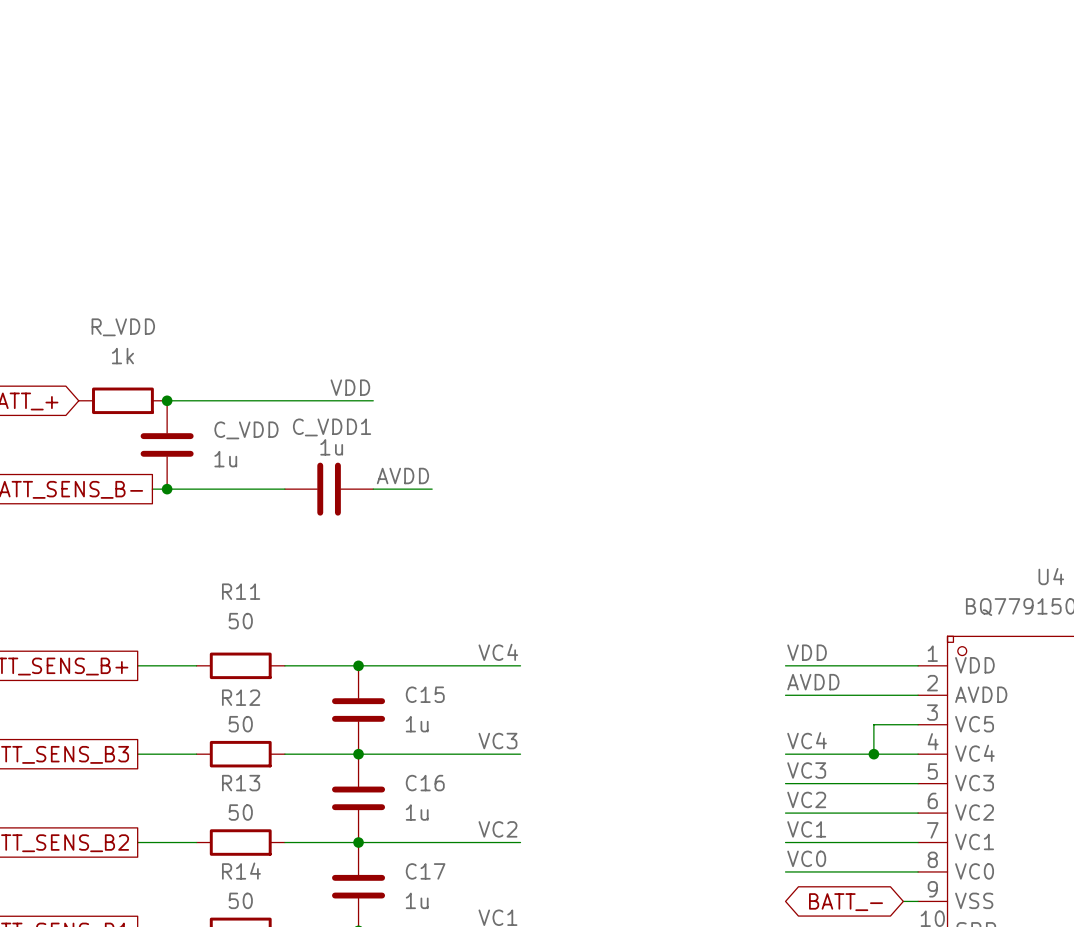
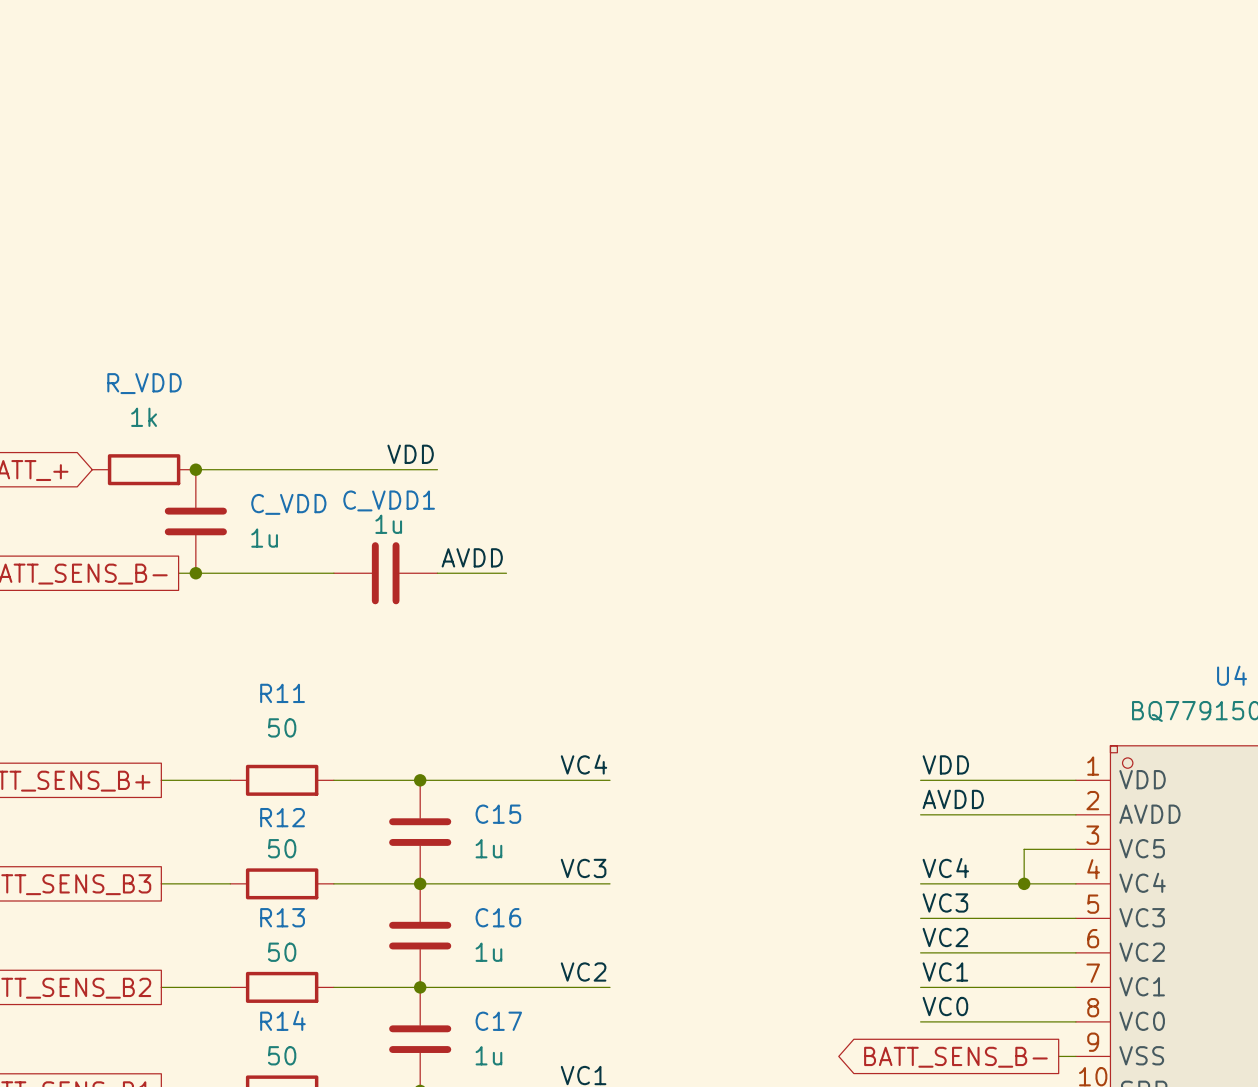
global label shape: bidirectional (846, 902) -> output (955, 1057)
global label: BATT_- (846, 902) -> BATT_SENS_B- (955, 1057)

